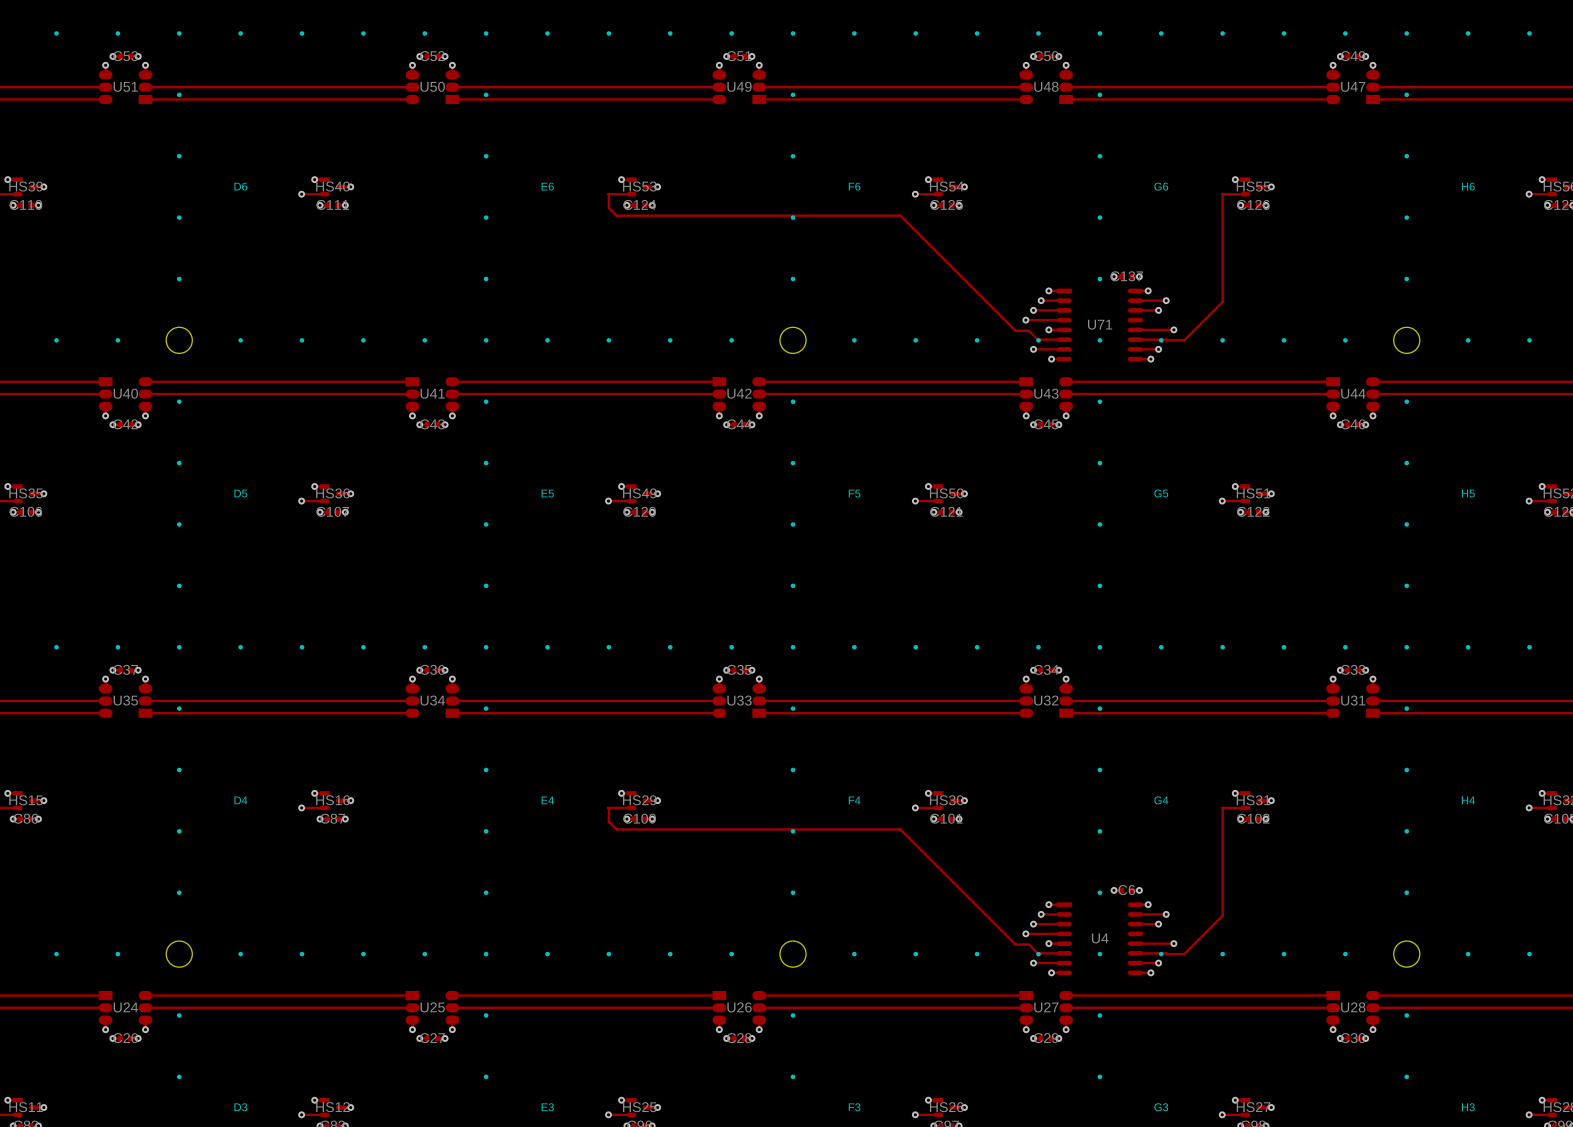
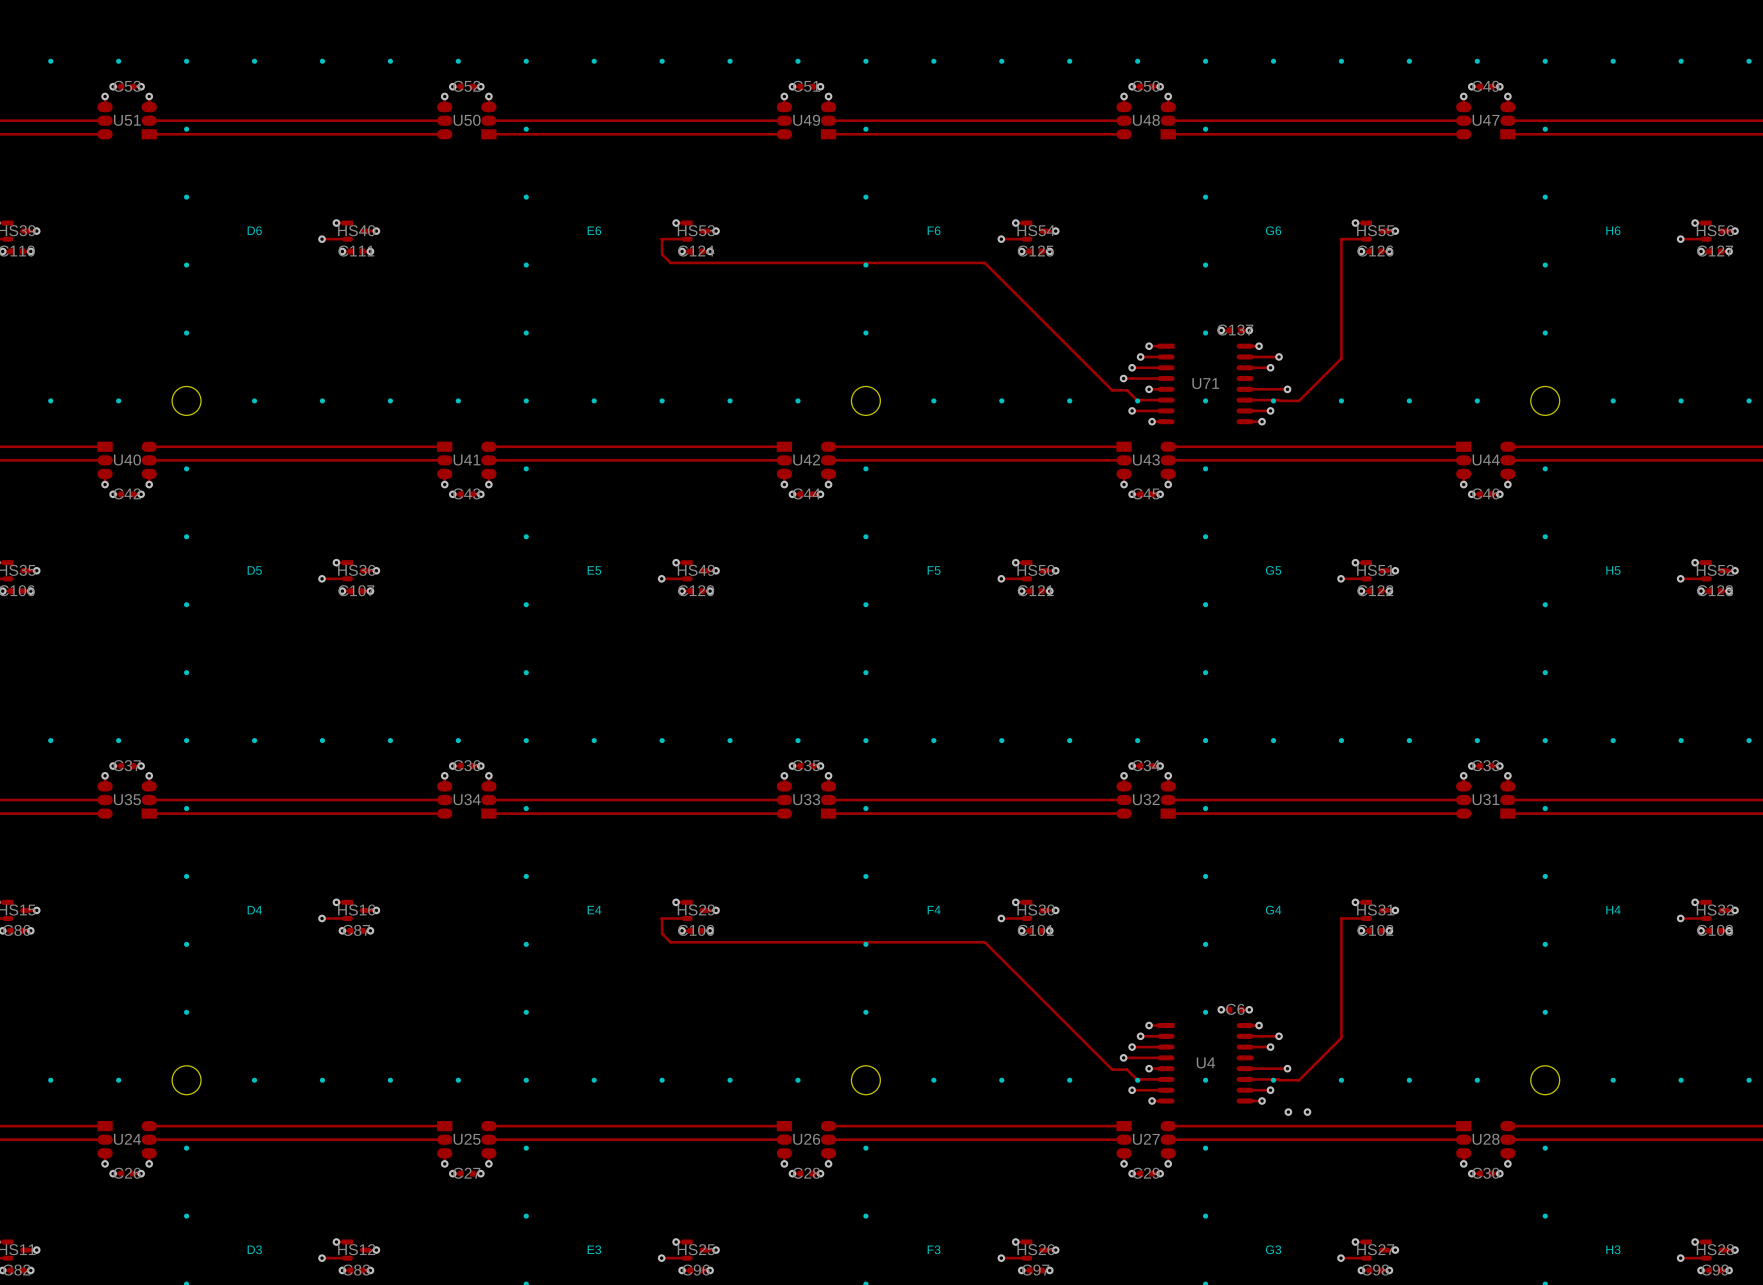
via: none -> (1288, 1112)
via: none -> (1307, 1112)

